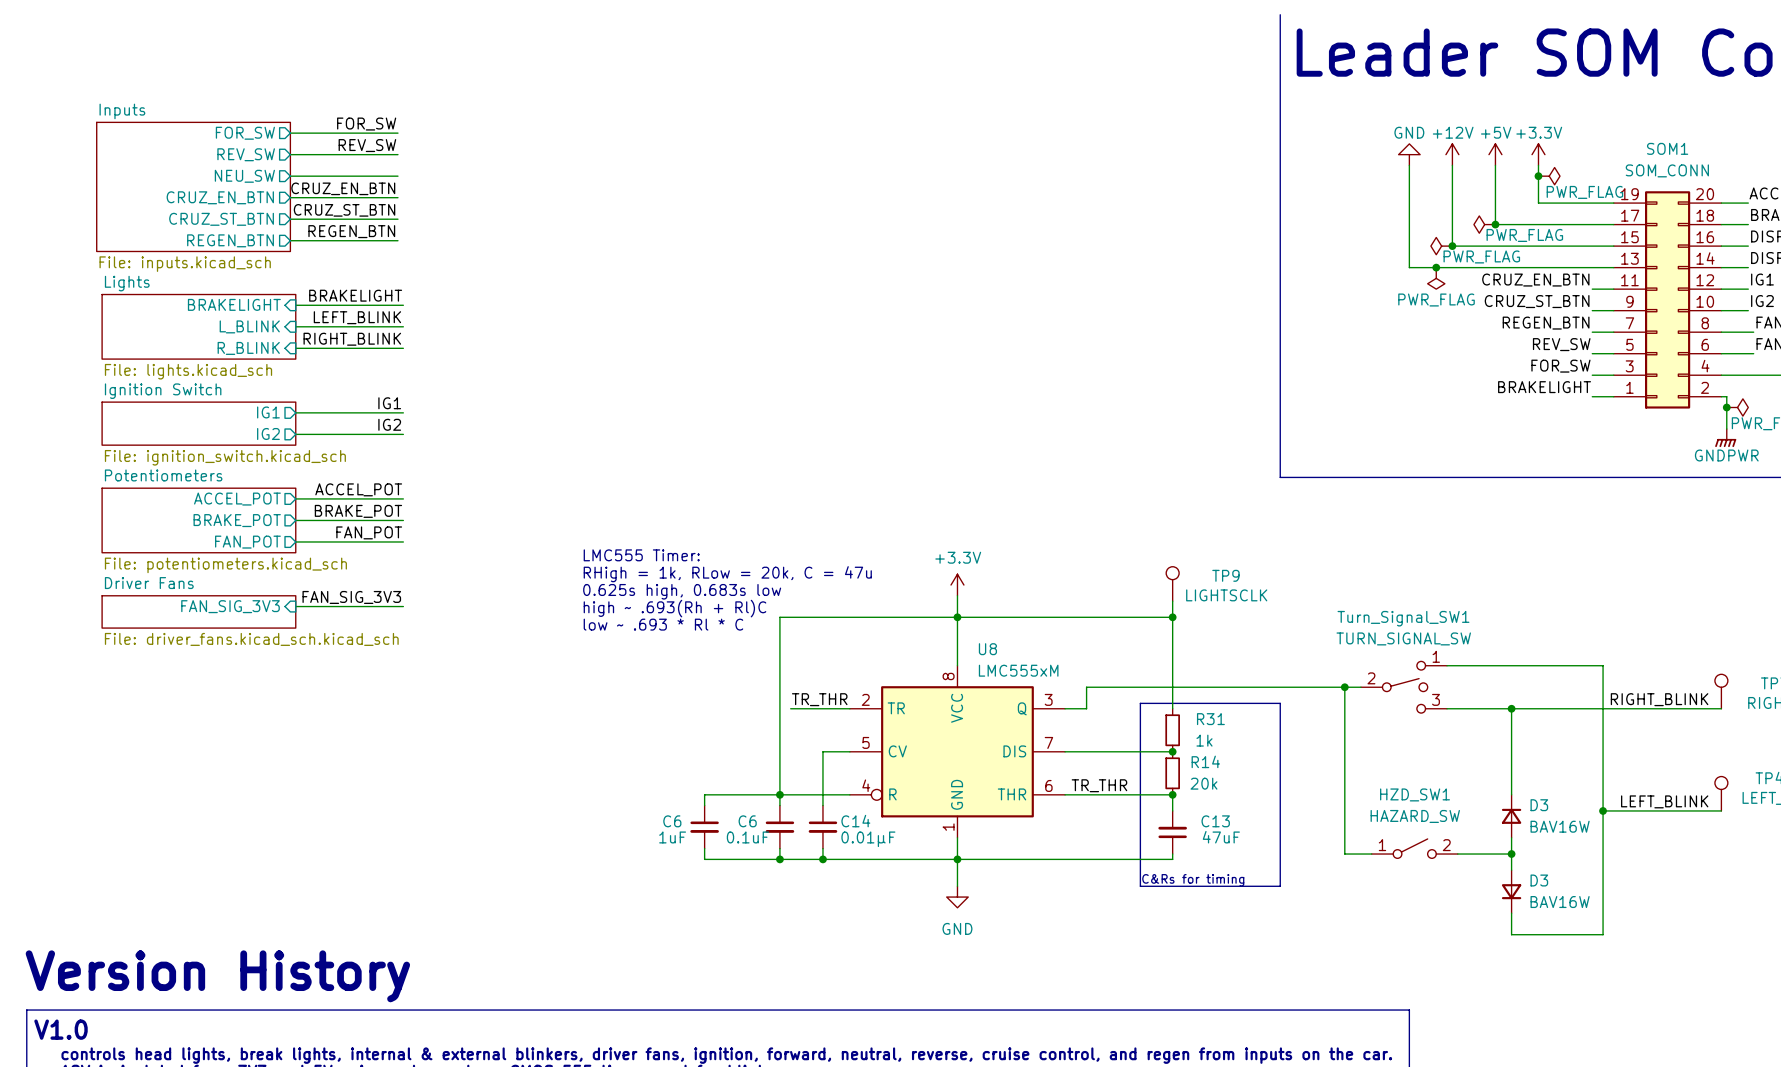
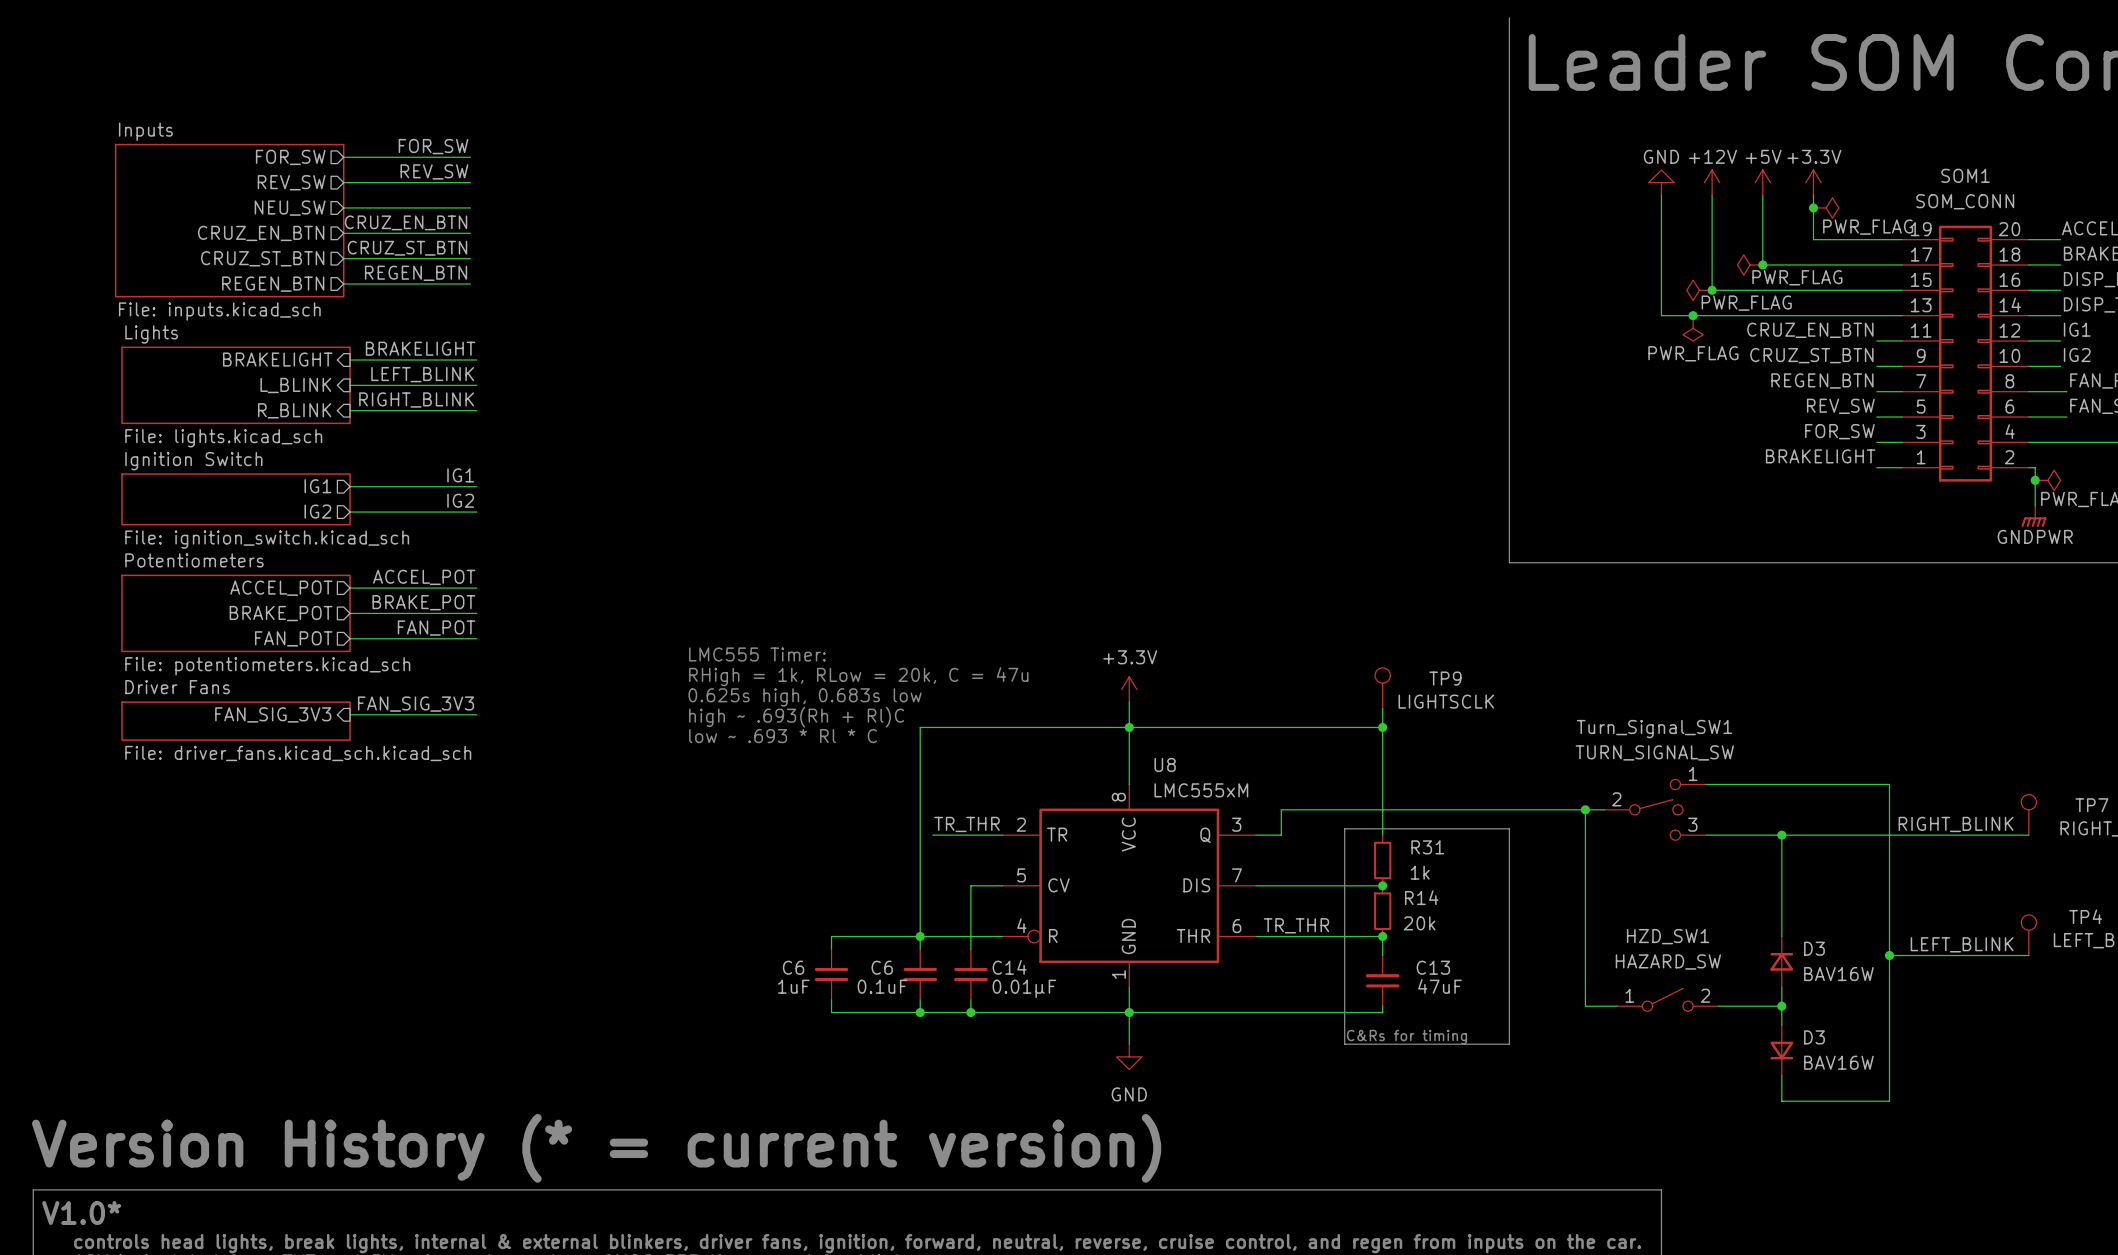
text: Version History (217, 976) -> Version History (* = current version) (596, 1148)
text: V1.0 (61, 1029) -> V1.0* (81, 1213)

